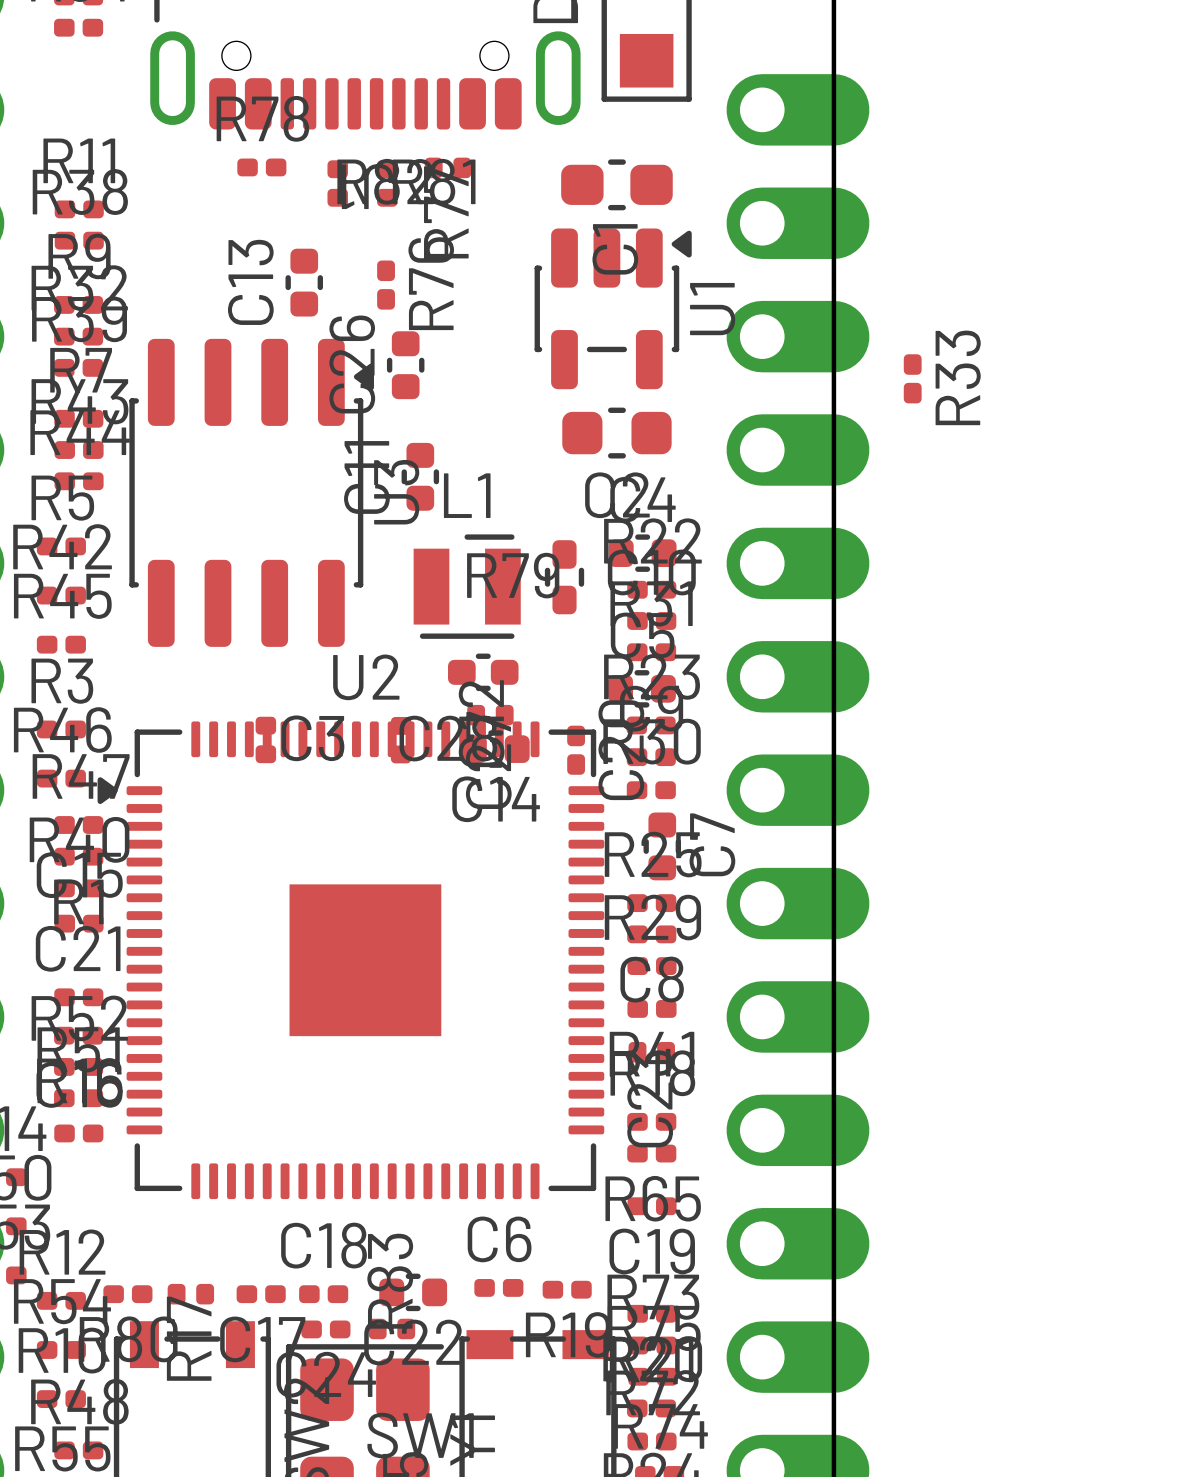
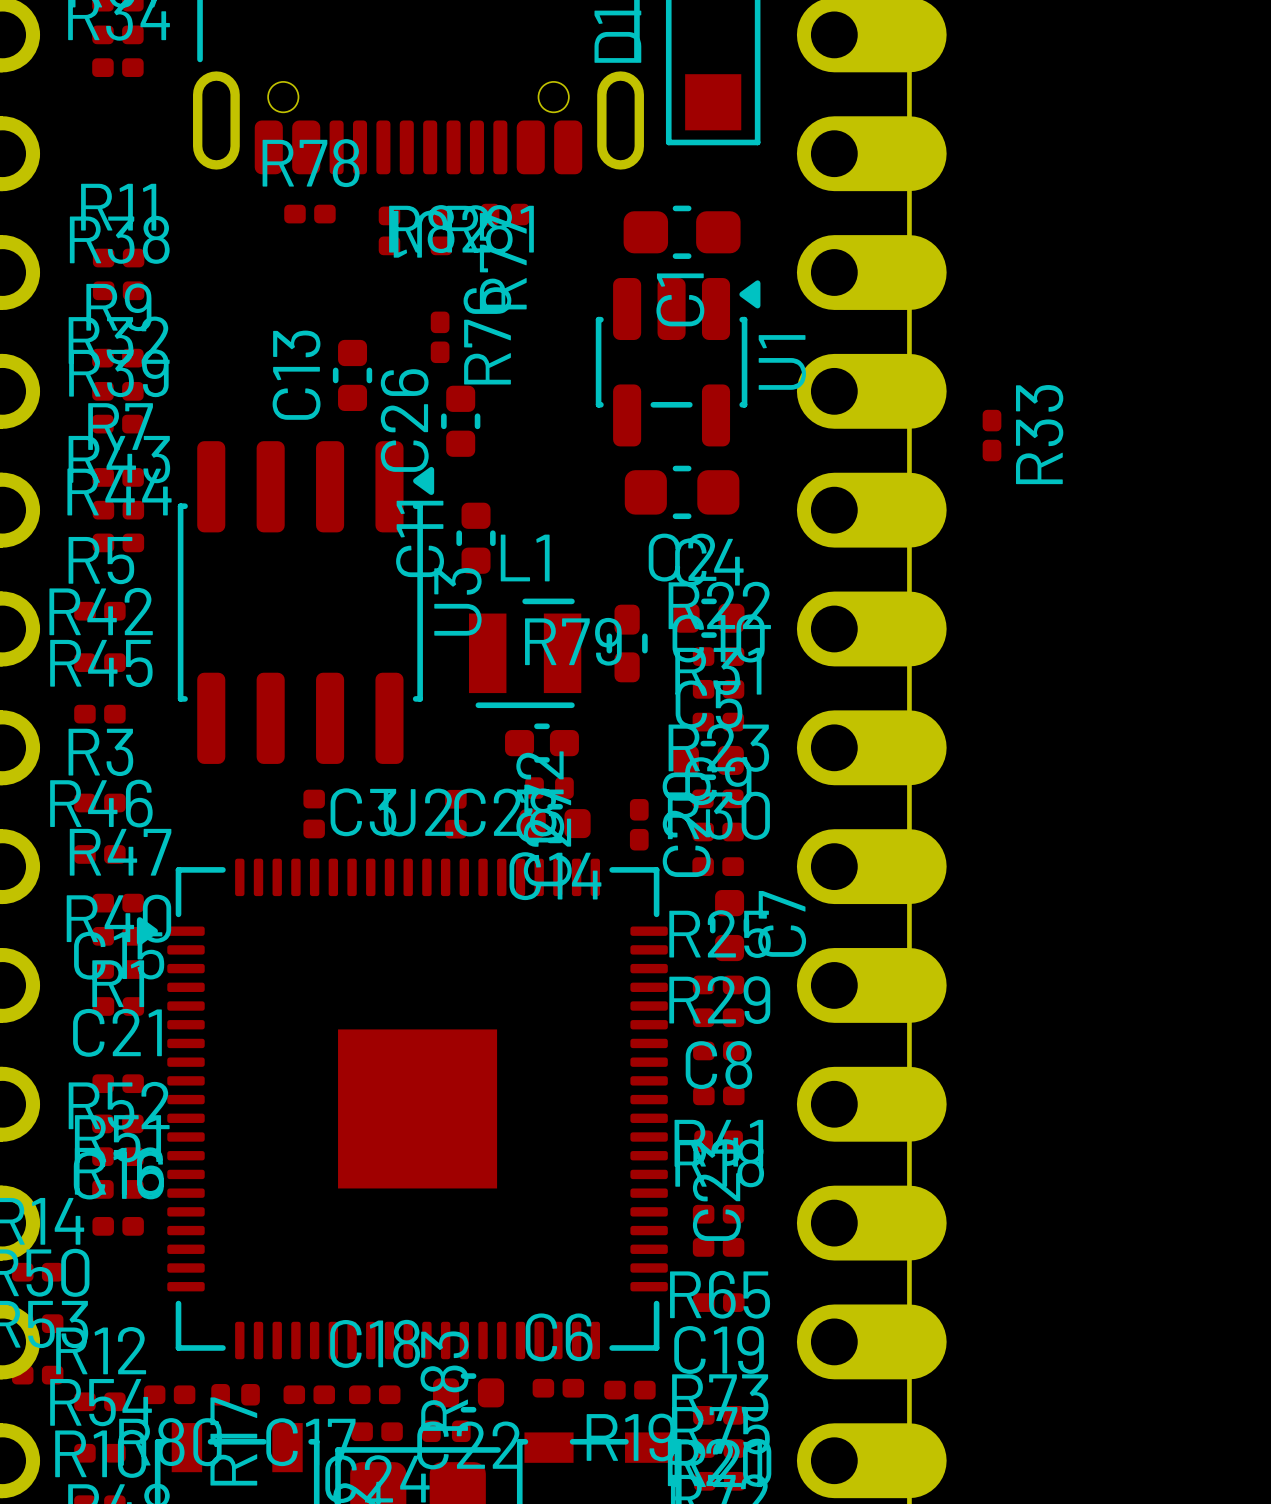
C13 position: (304, 282) -> (352, 375)
U3 position: (251, 492) -> (305, 602)
U2 position: (350, 960) -> (402, 1108)

